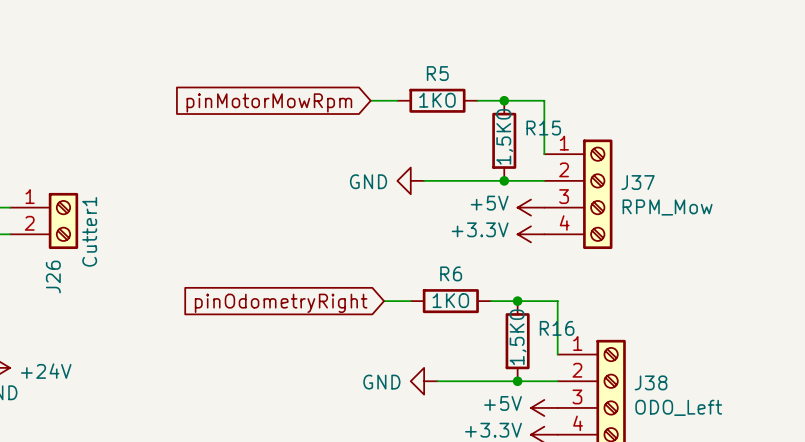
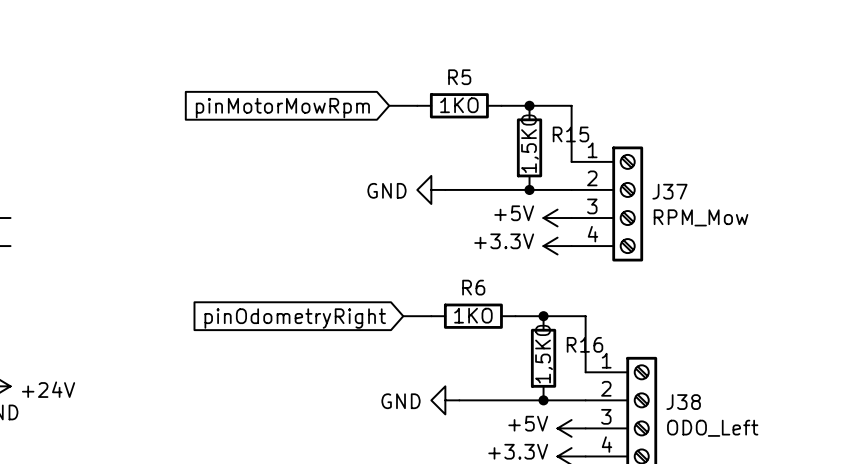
J26: Cutter1 (44, 220) -> none

